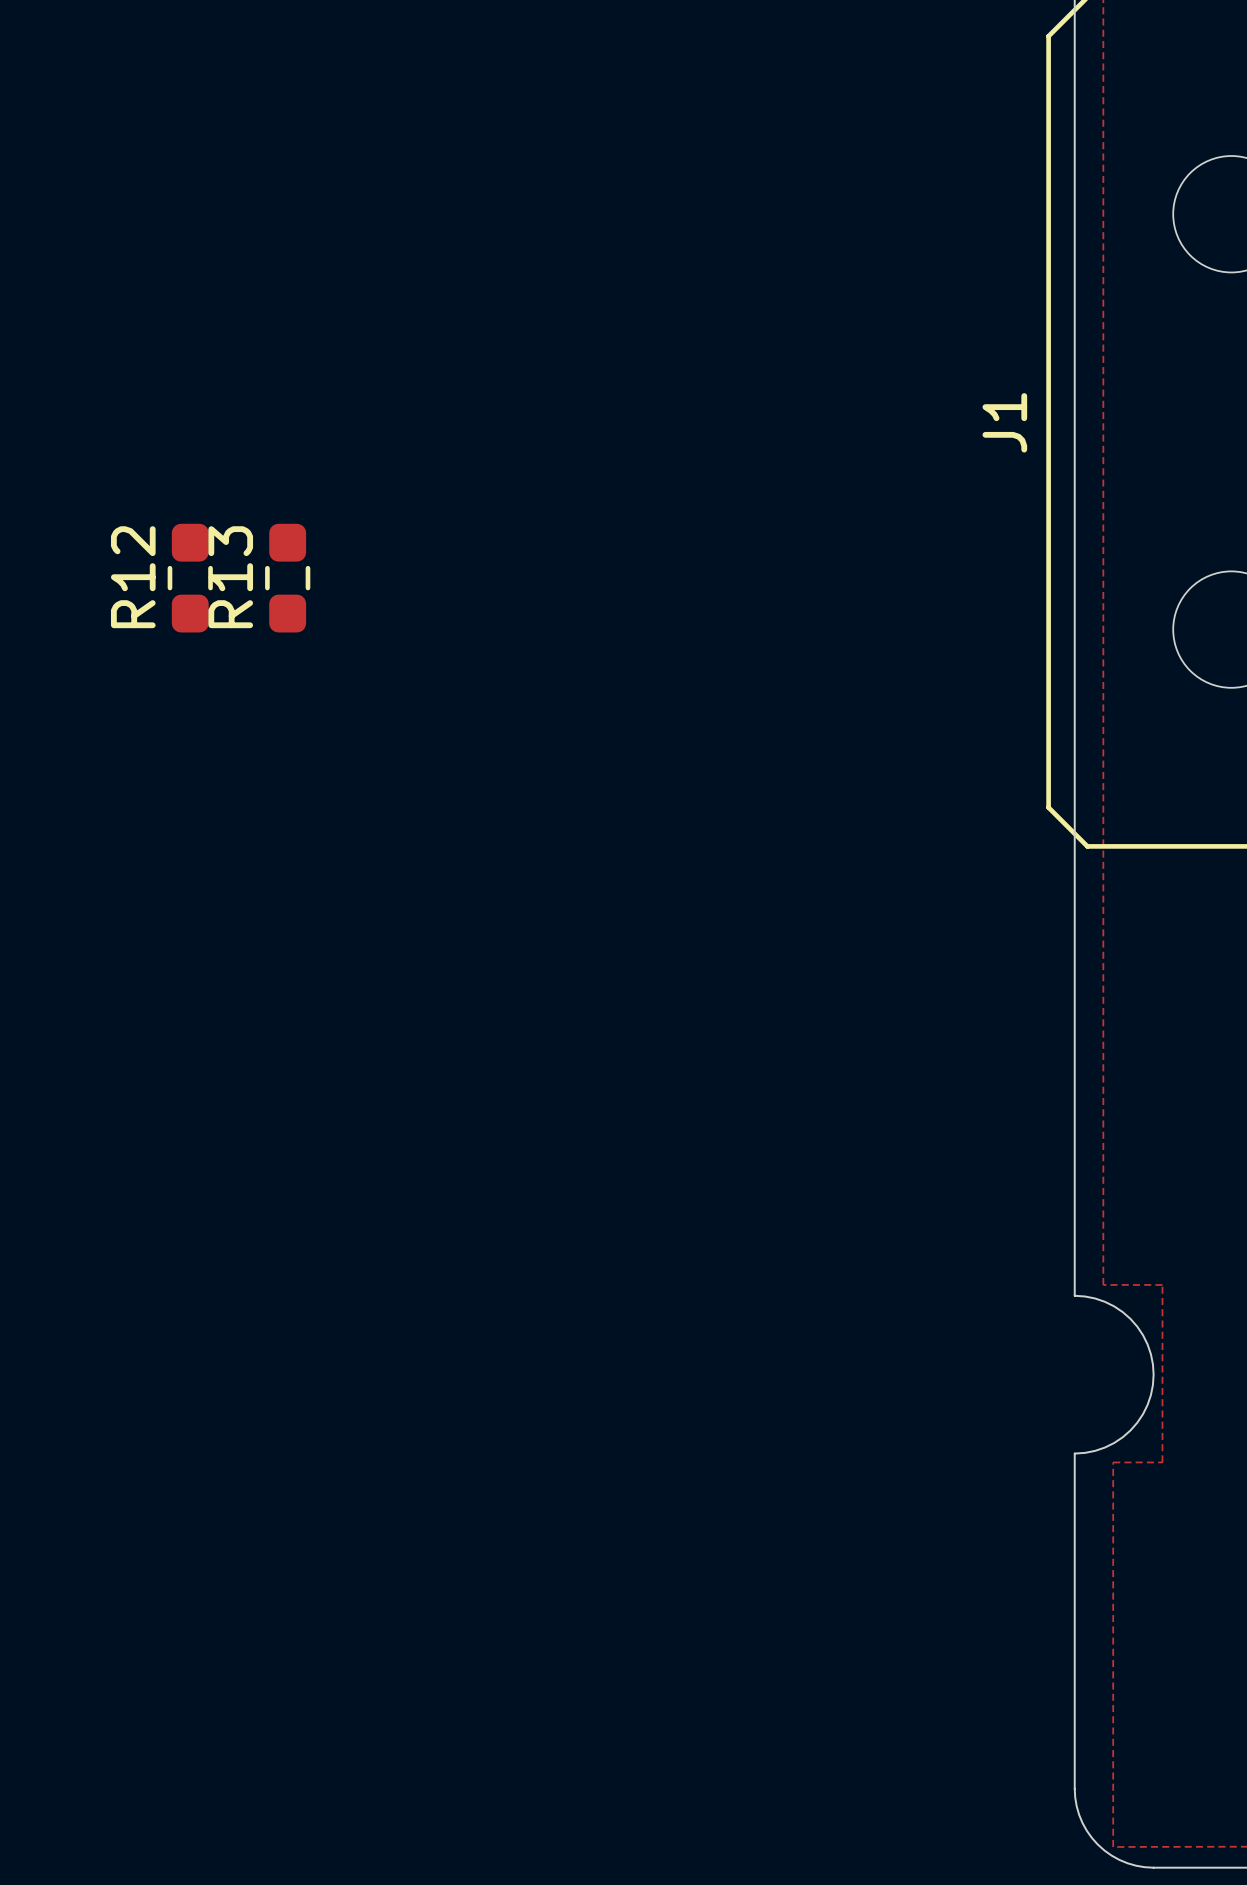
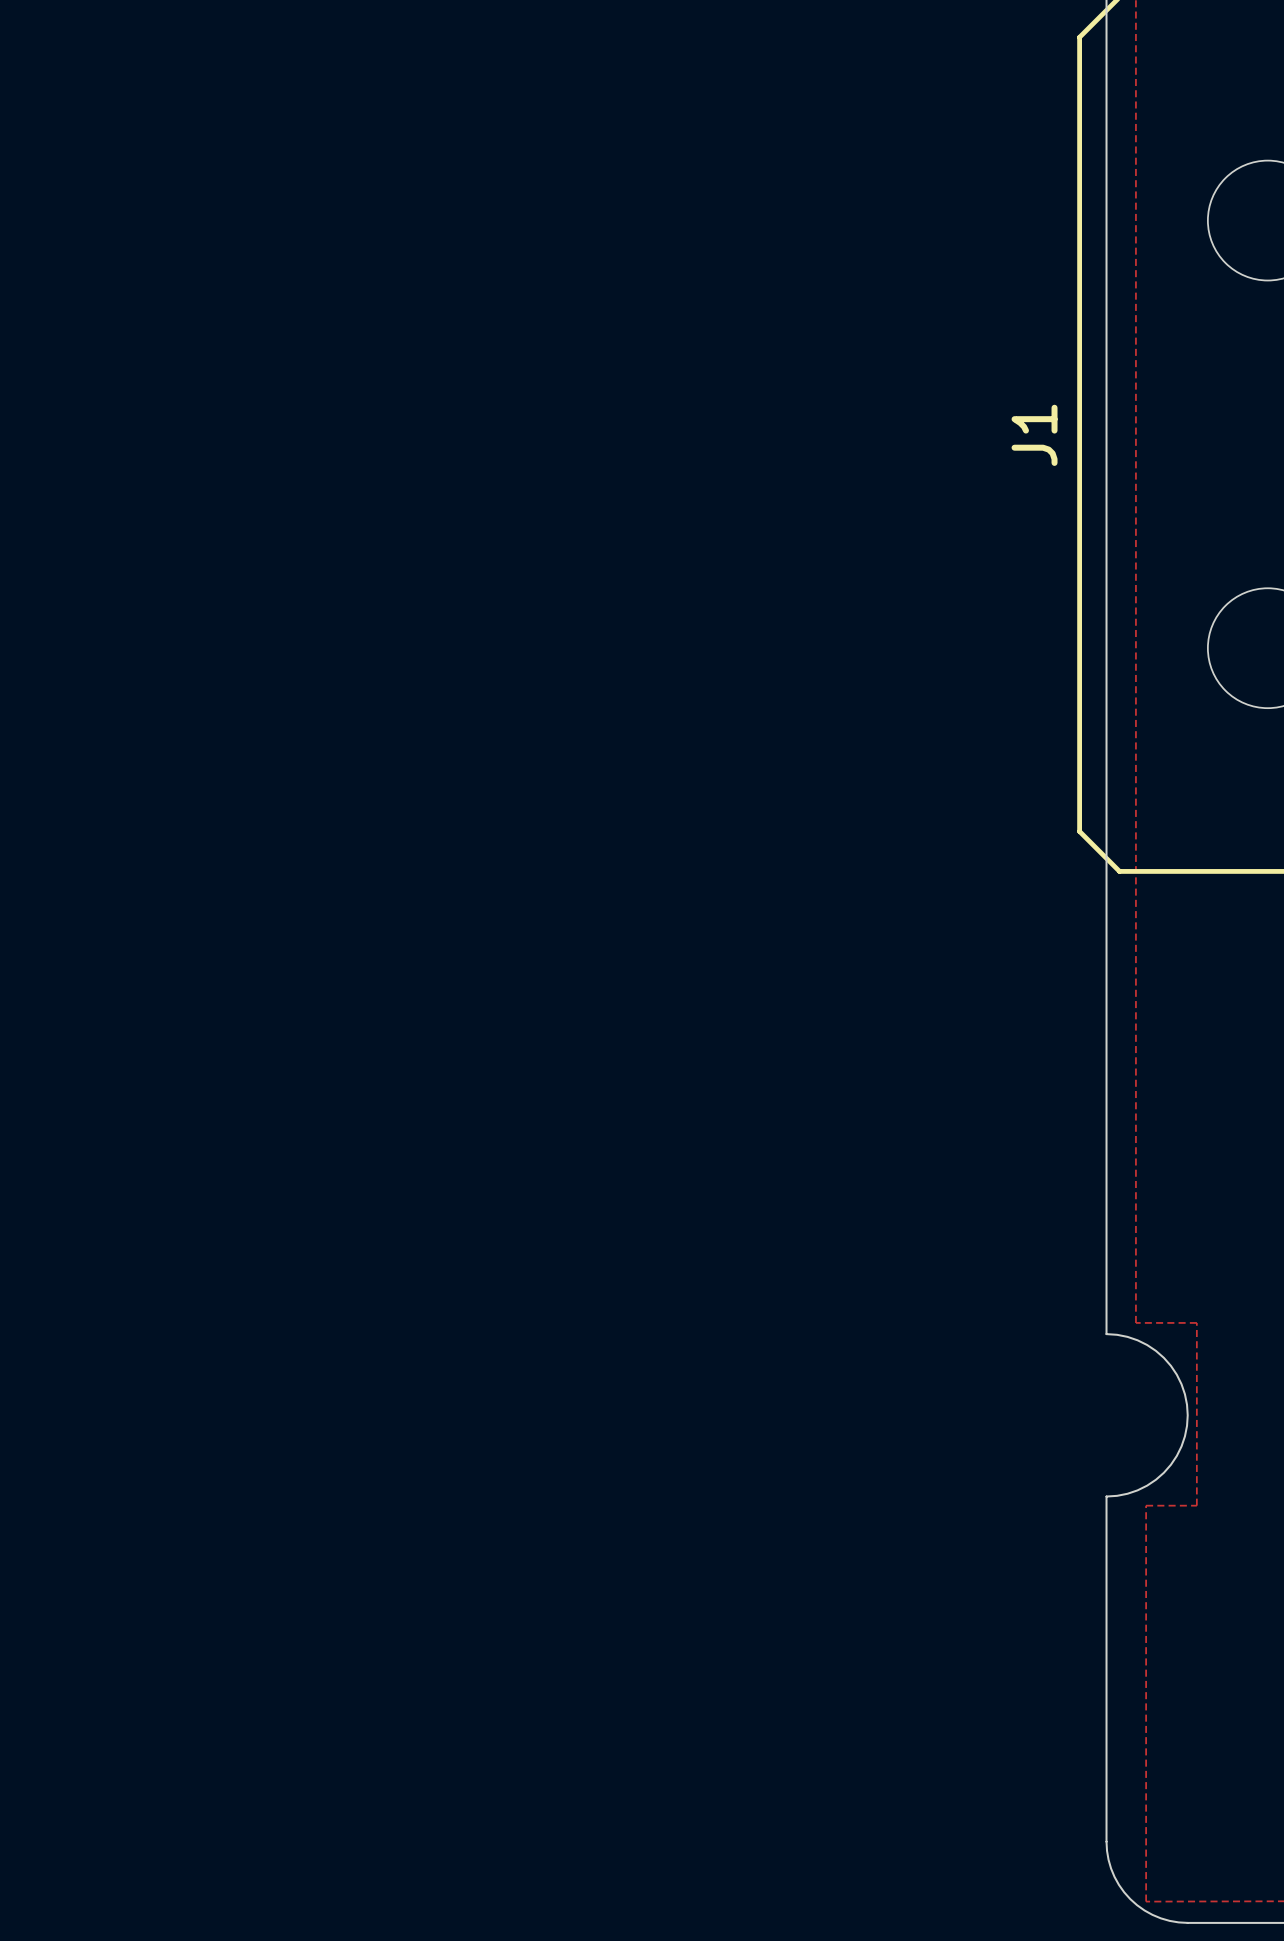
R12: (190, 578) -> none
R13: (287, 578) -> none

